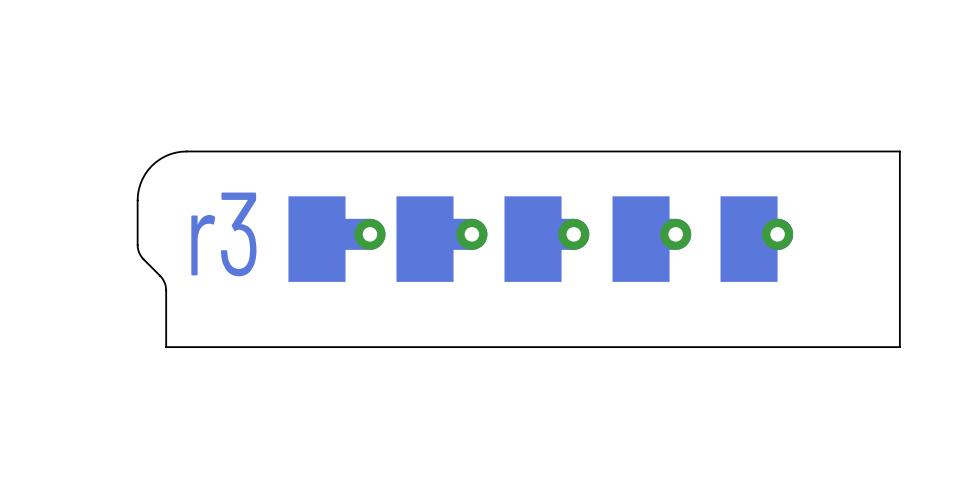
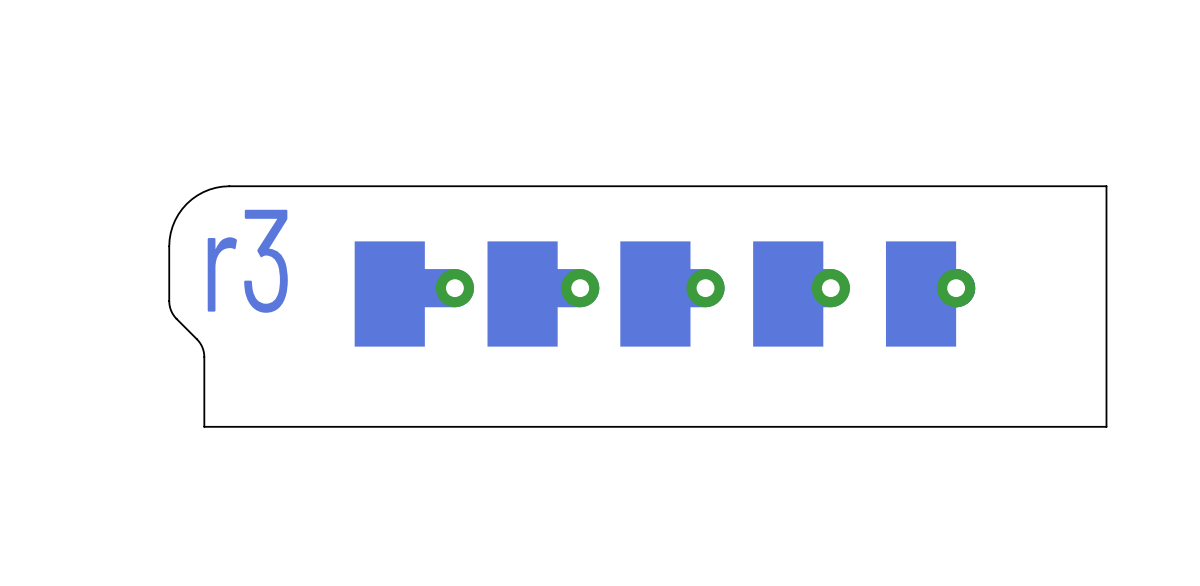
text position: r3 (223, 234) -> r3 (247, 261)

